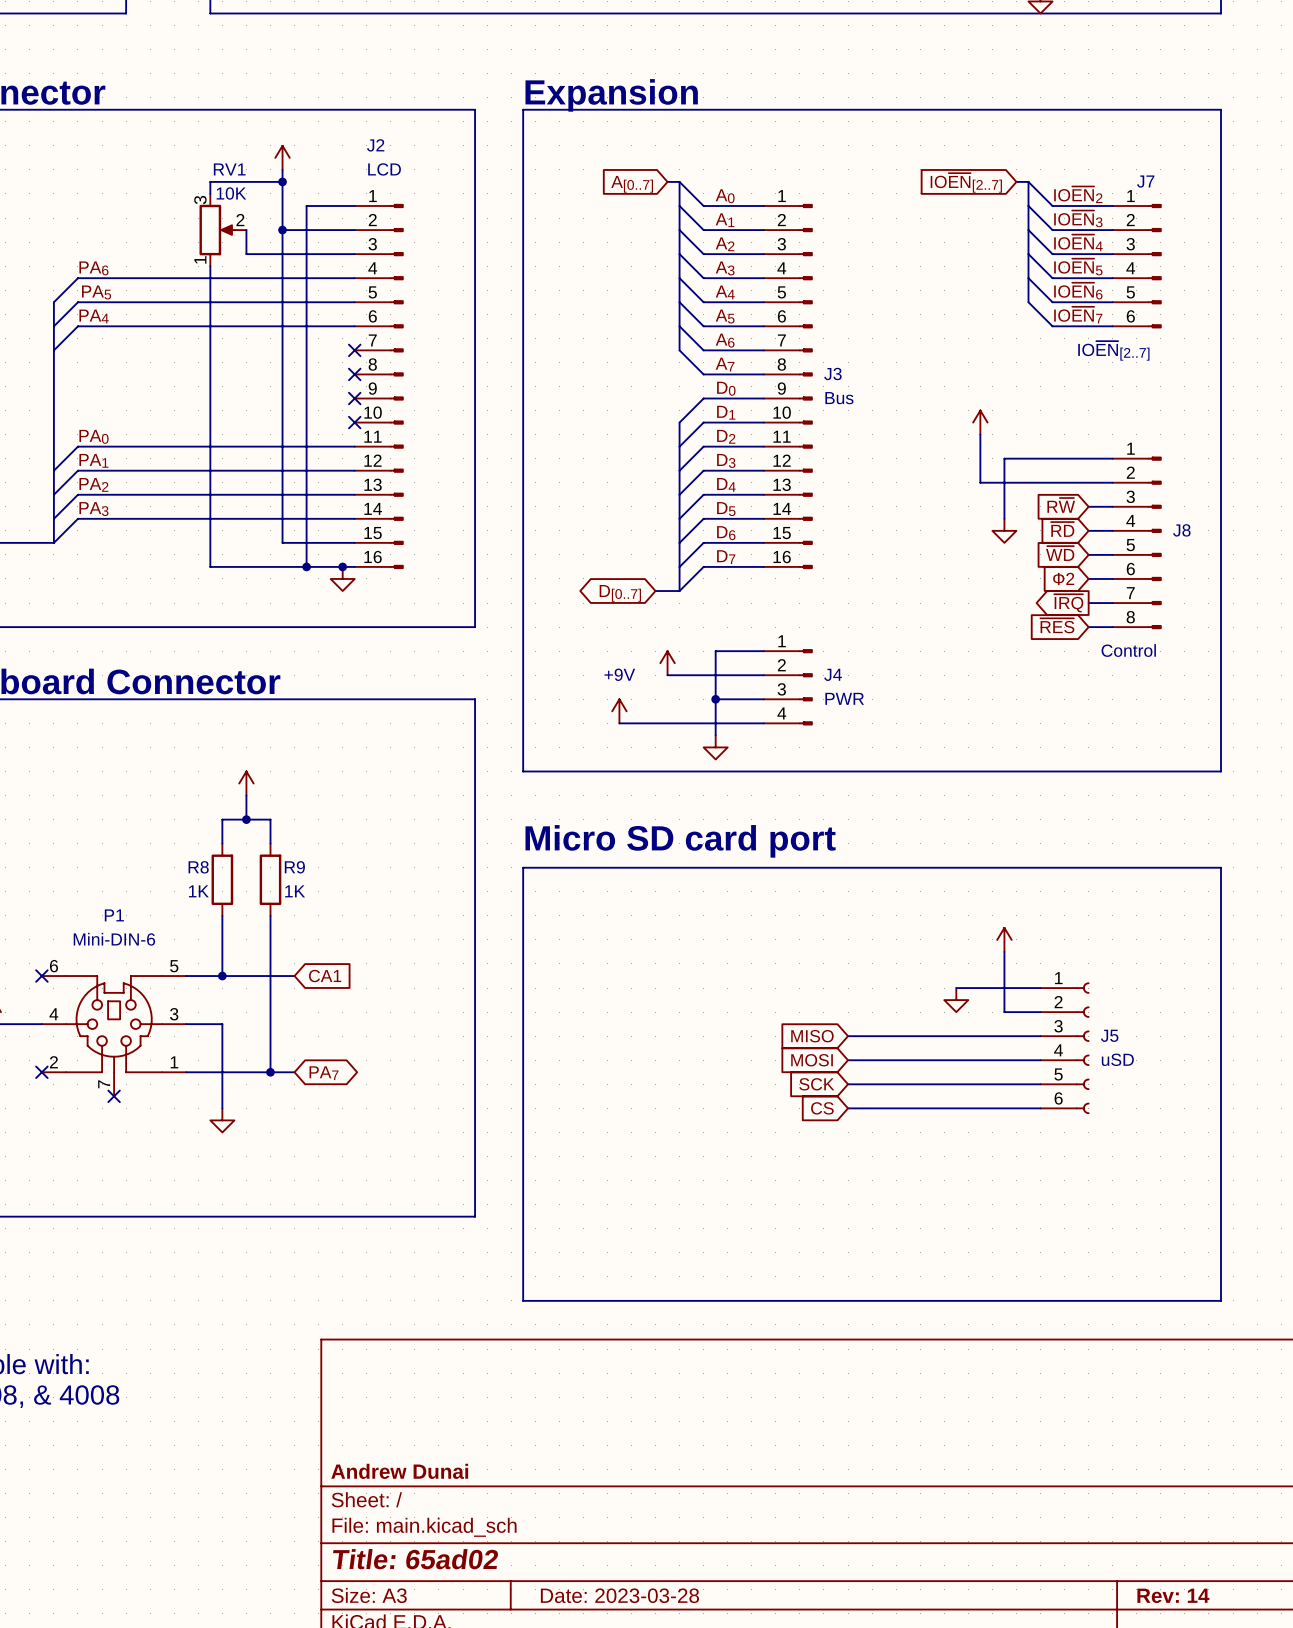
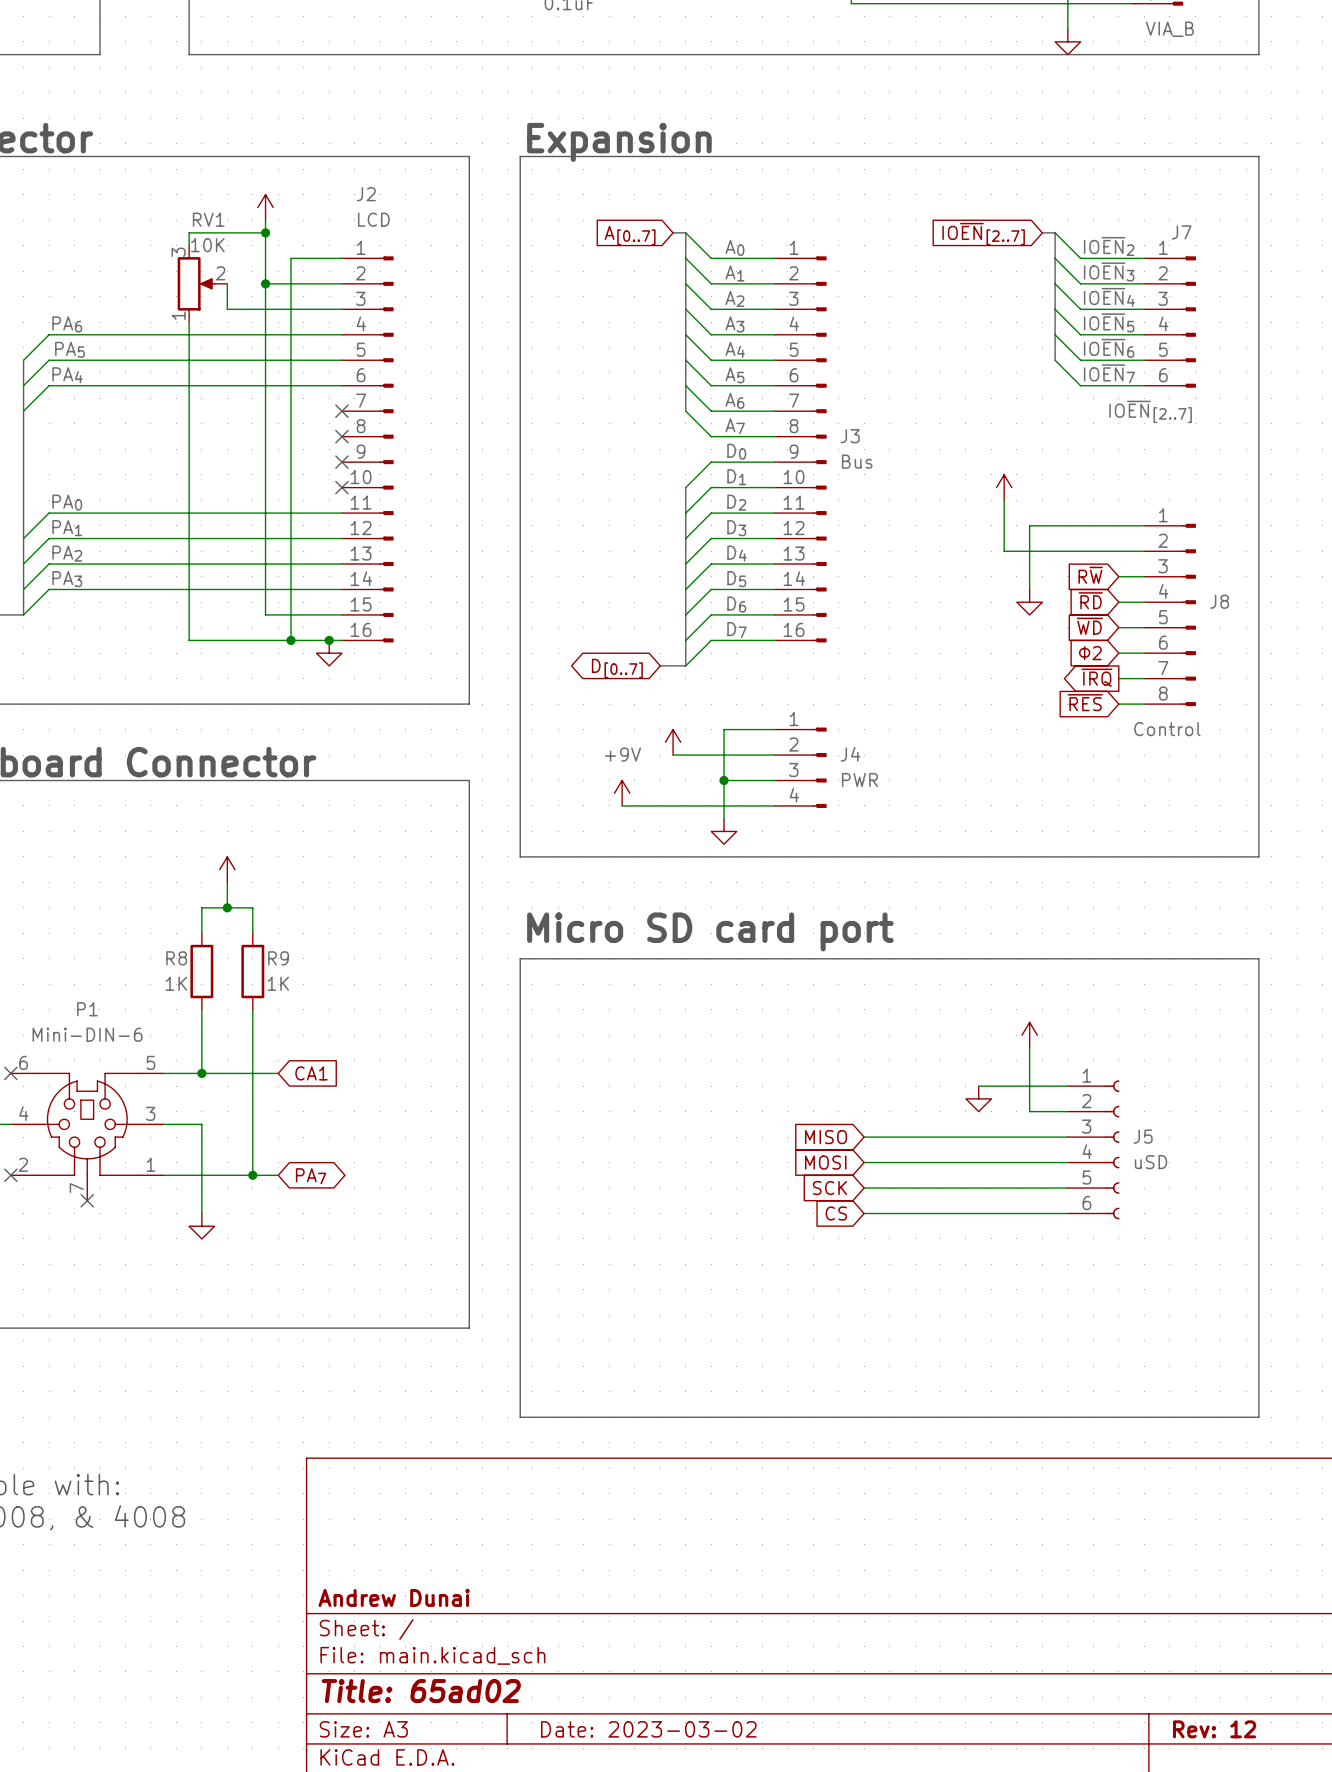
title block: Date: 2023-03-28 (619, 1595) -> Date: 2023-03-02 (648, 1729)
title block: Rev: 14 (1173, 1595) -> Rev: 12 (1214, 1729)

